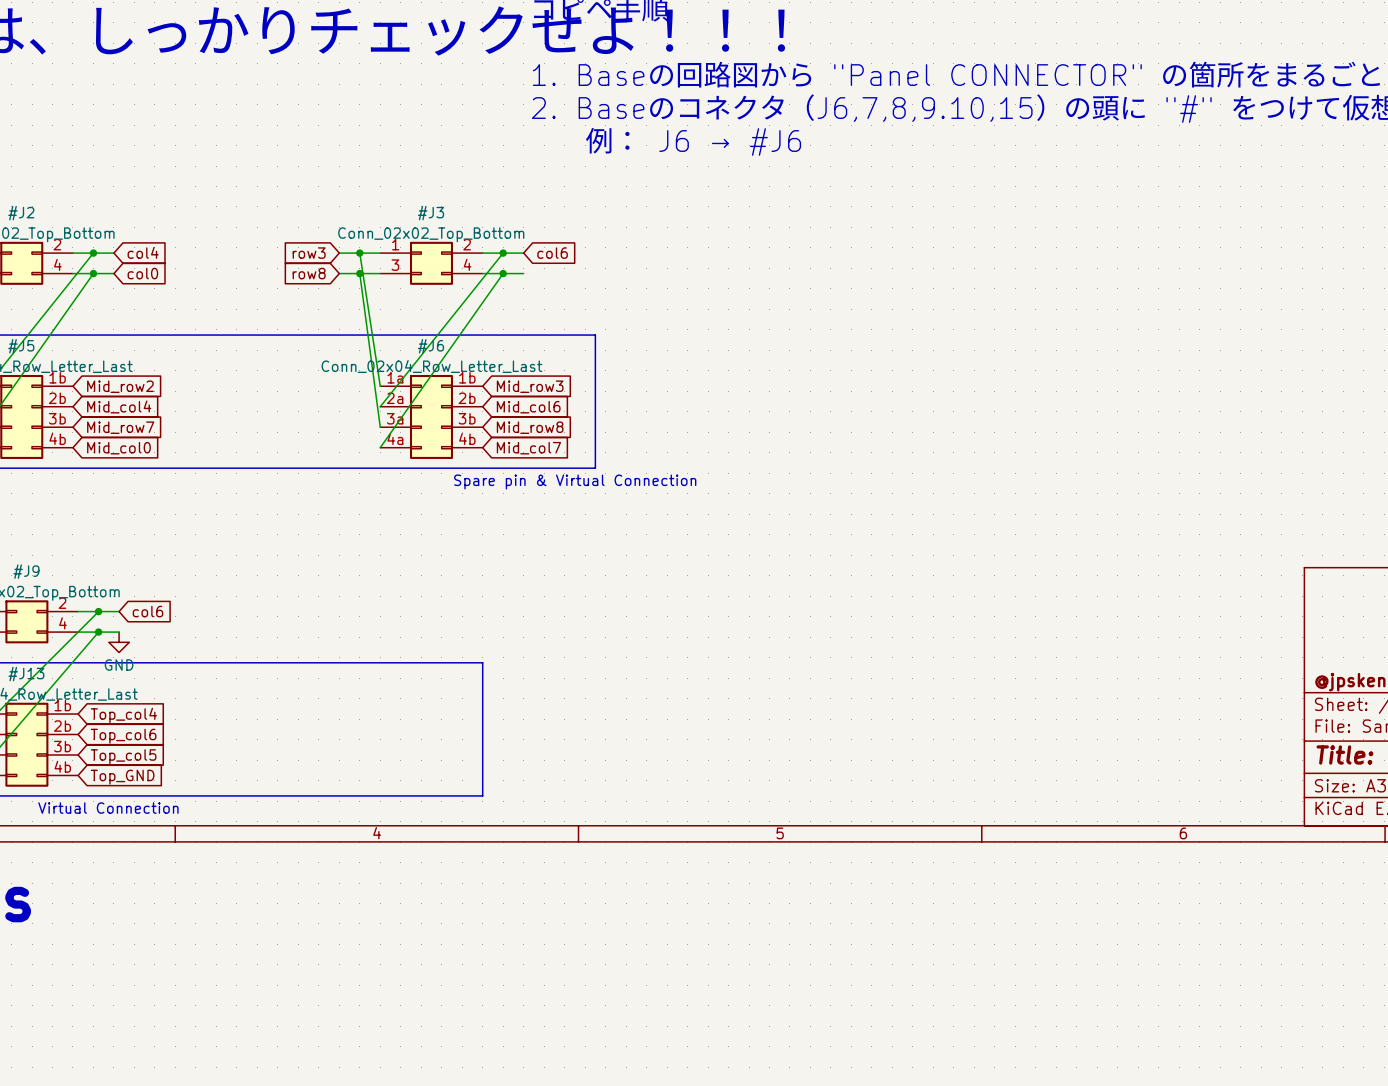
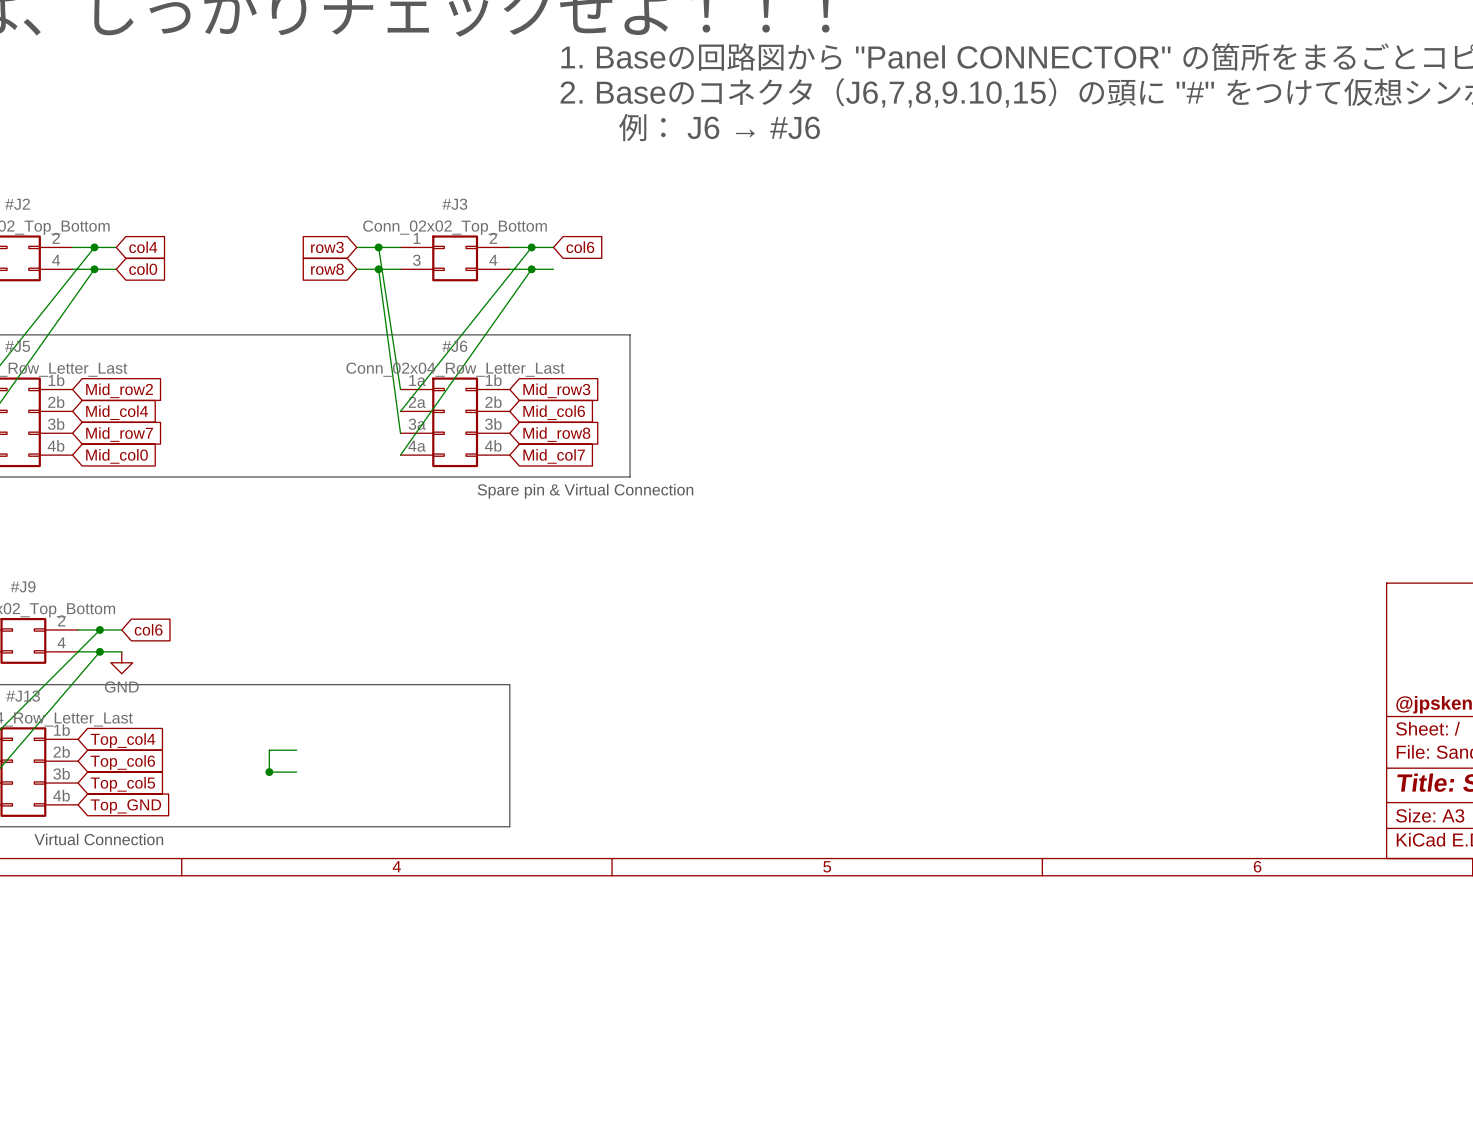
wire: none -> (296, 750) (269, 750) (269, 772) (296, 772)
junction: none -> (269, 772)

